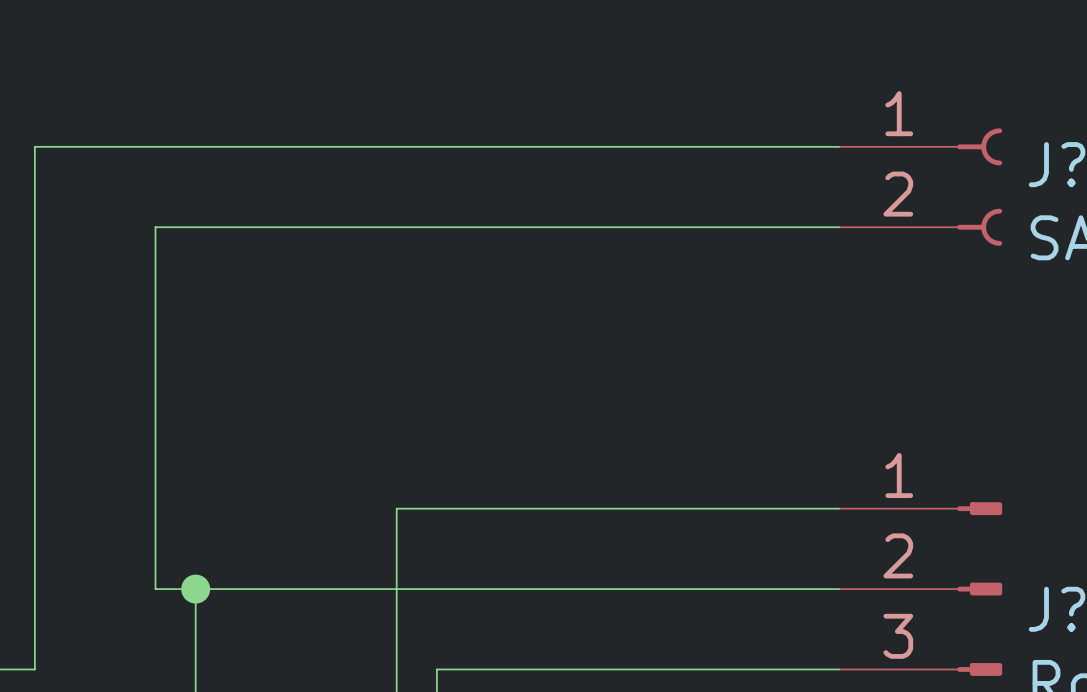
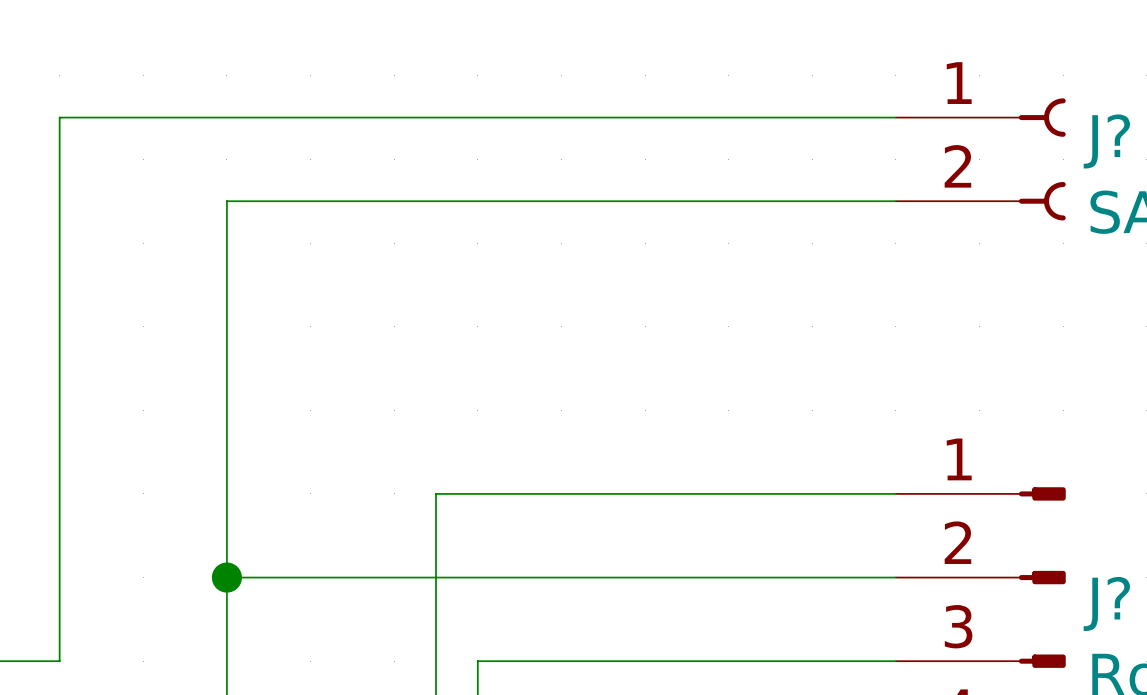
wire: (195, 227) (155, 227) (155, 589) (195, 589) -> (226, 201) (226, 577)

